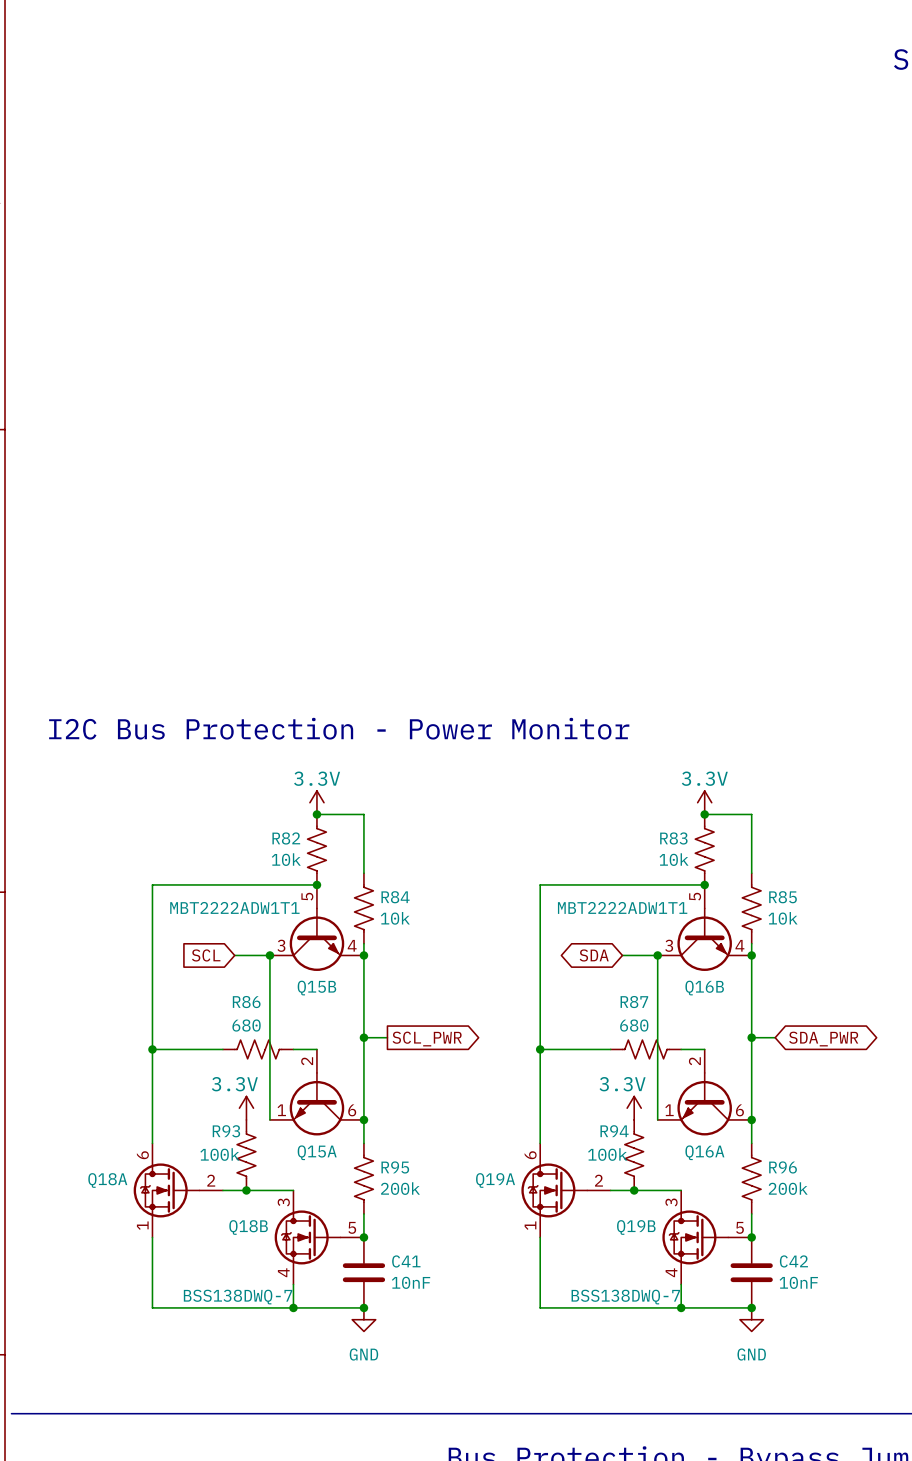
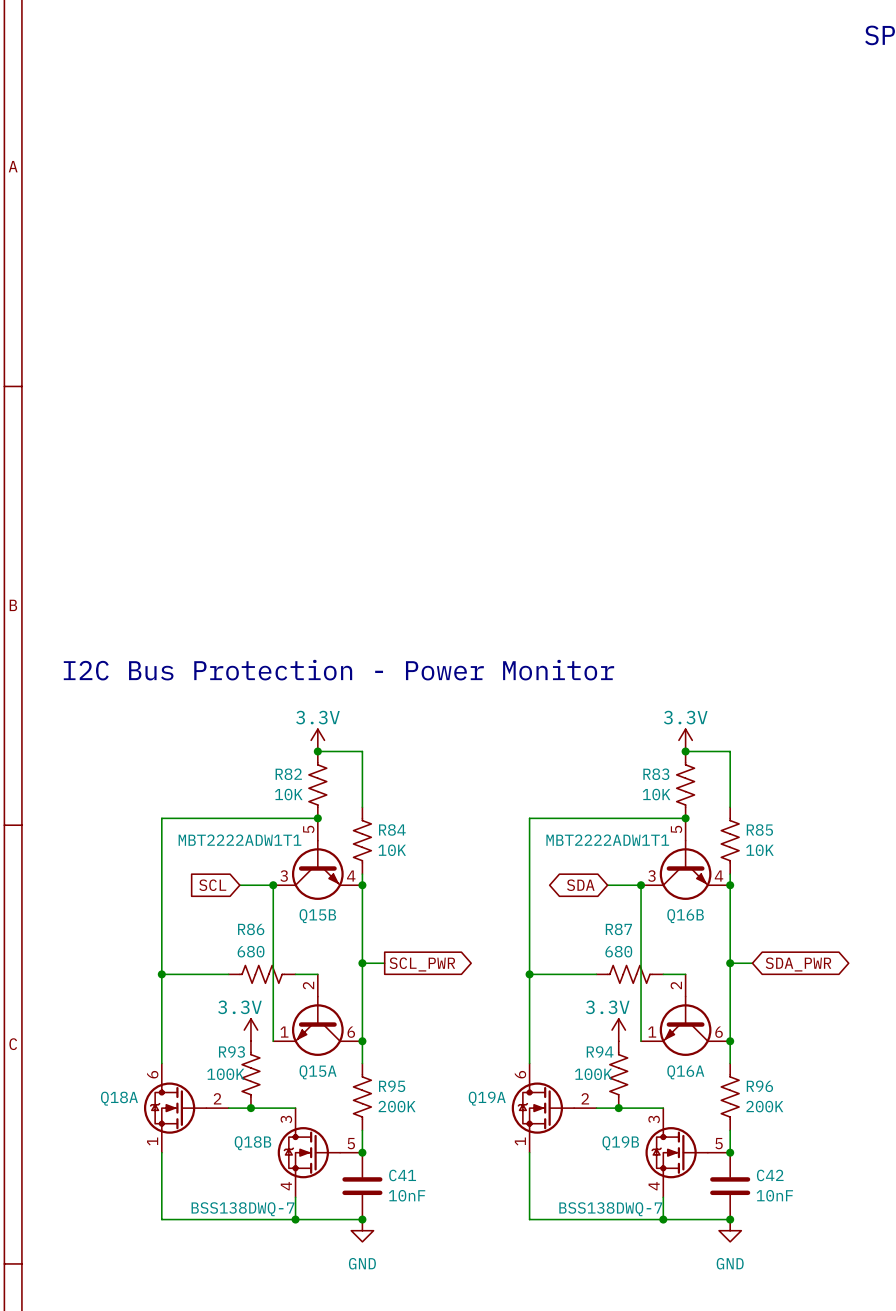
R82 value: 10k (286, 859) -> 10K (288, 794)
R83 value: 10k (674, 859) -> 10K (656, 794)
R84 value: 10k (395, 918) -> 10K (392, 850)
R85 value: 10k (783, 918) -> 10K (759, 850)
R93 value: 100k (219, 1154) -> 100K (225, 1074)
R94 value: 100k (607, 1154) -> 100K (593, 1074)
R95 value: 200k (400, 1188) -> 200K (397, 1106)
R96 value: 200k (788, 1188) -> 200K (764, 1106)

